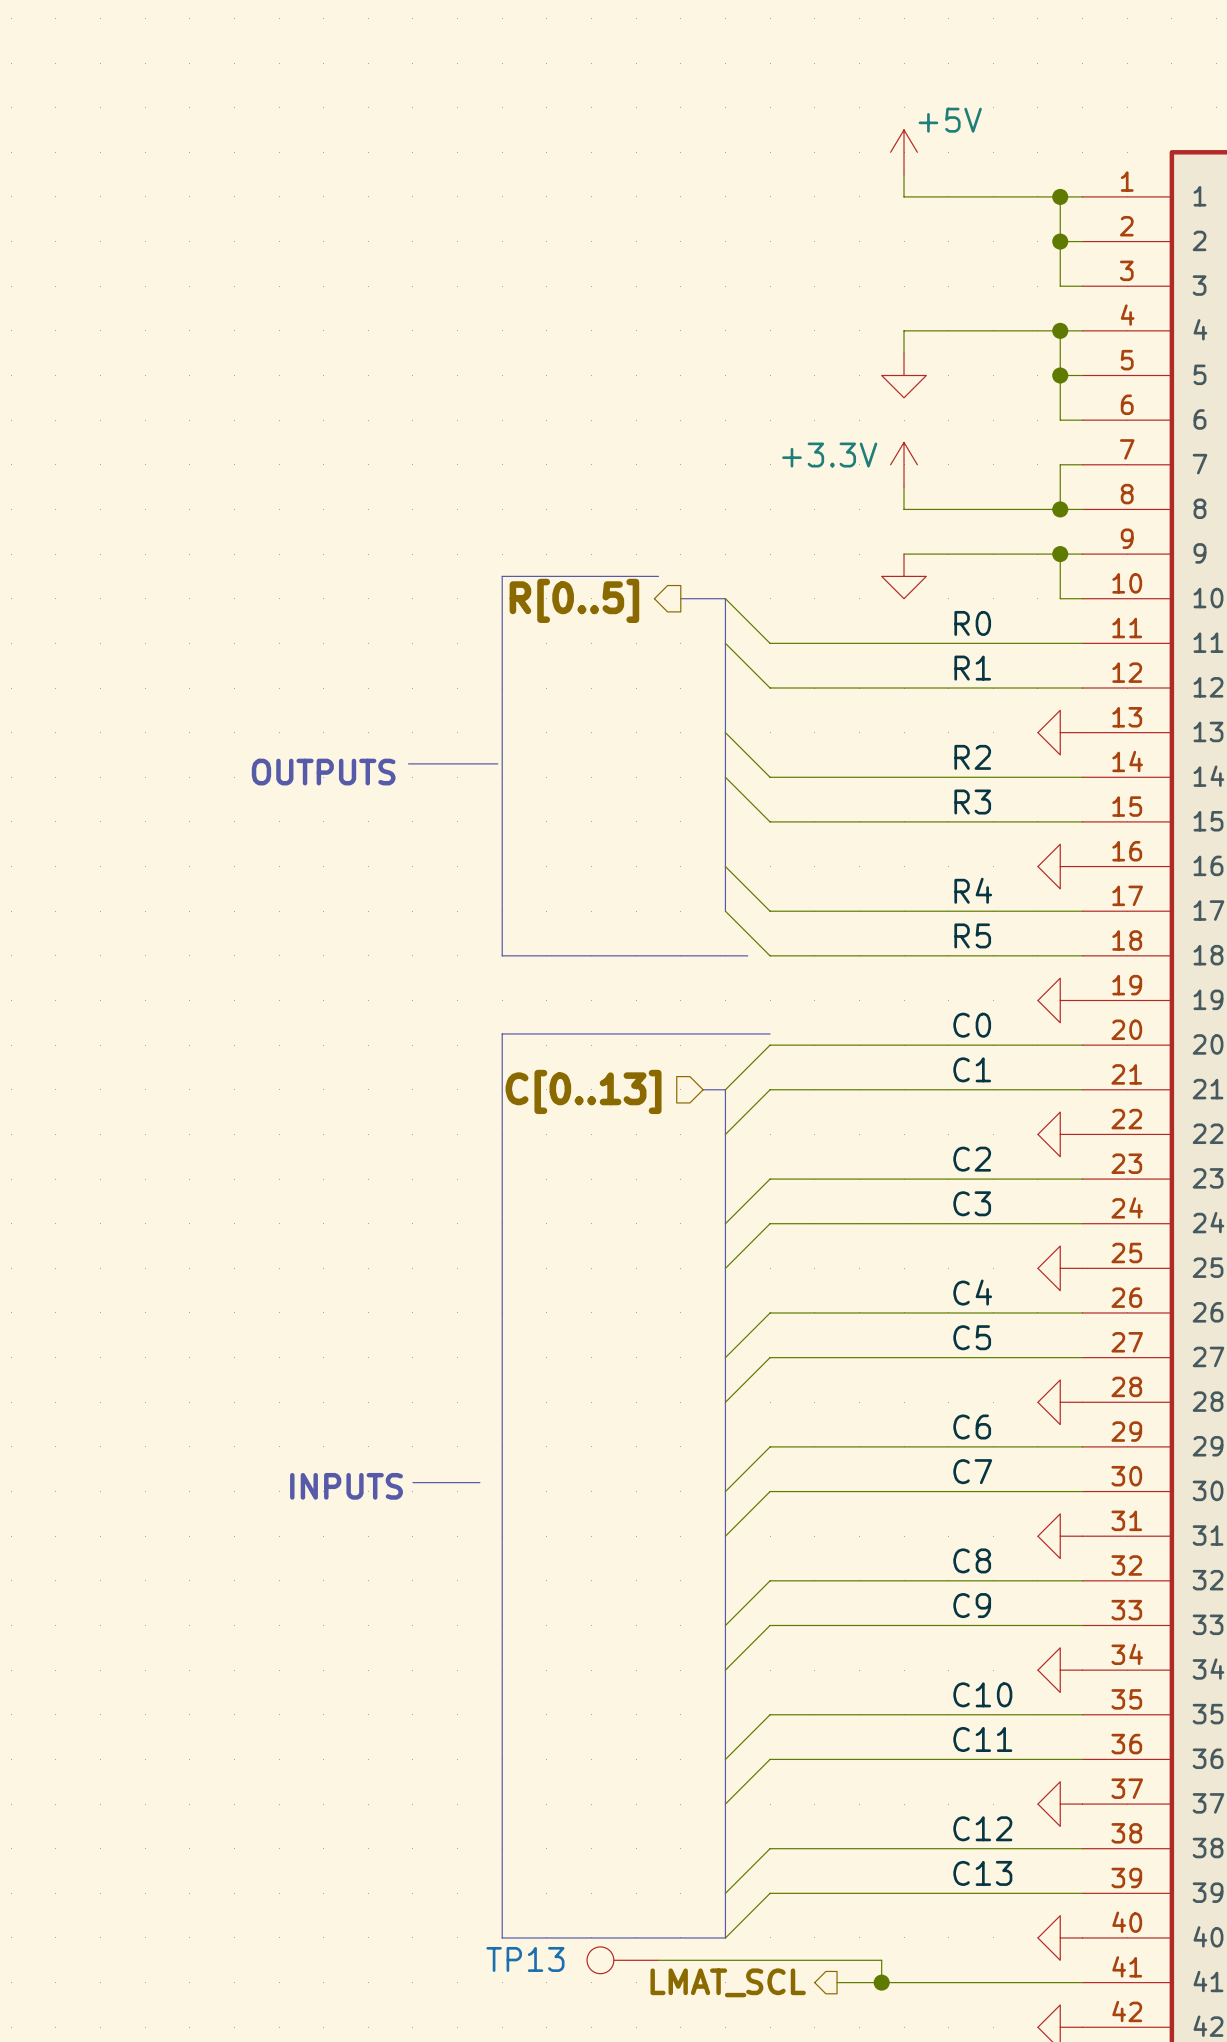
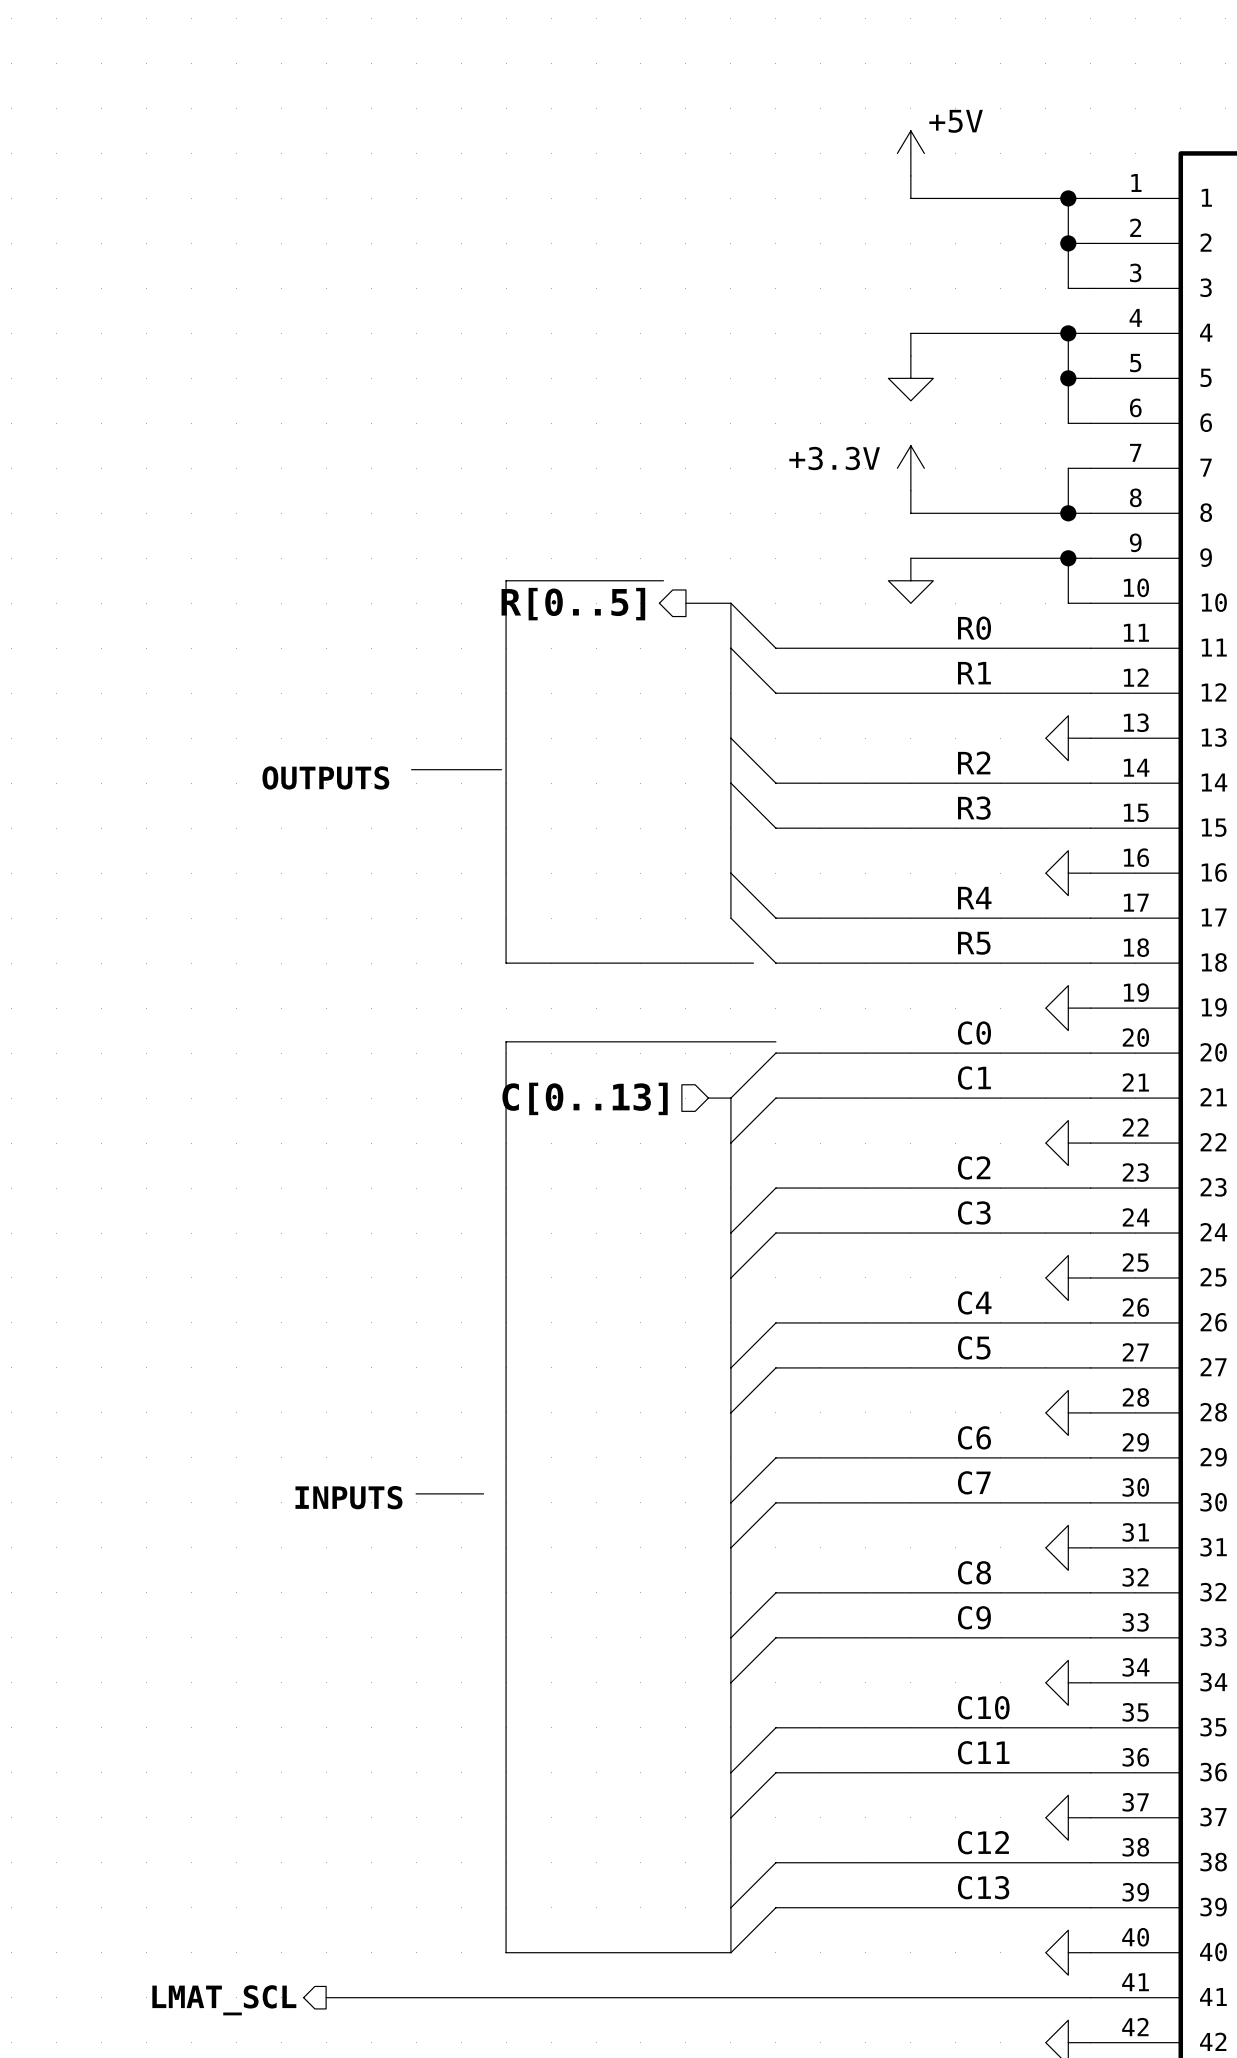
TP13: (622, 1960) -> none
wire: (658, 1960) (881, 1960) (881, 1982) -> none
hierarchical label: none -> LMAT_SCL (224, 2000)
wire: none -> (326, 1997) (843, 1997)
hierarchical label: LMAT_SCL (728, 1982) -> none
junction: (881, 1982) -> none

